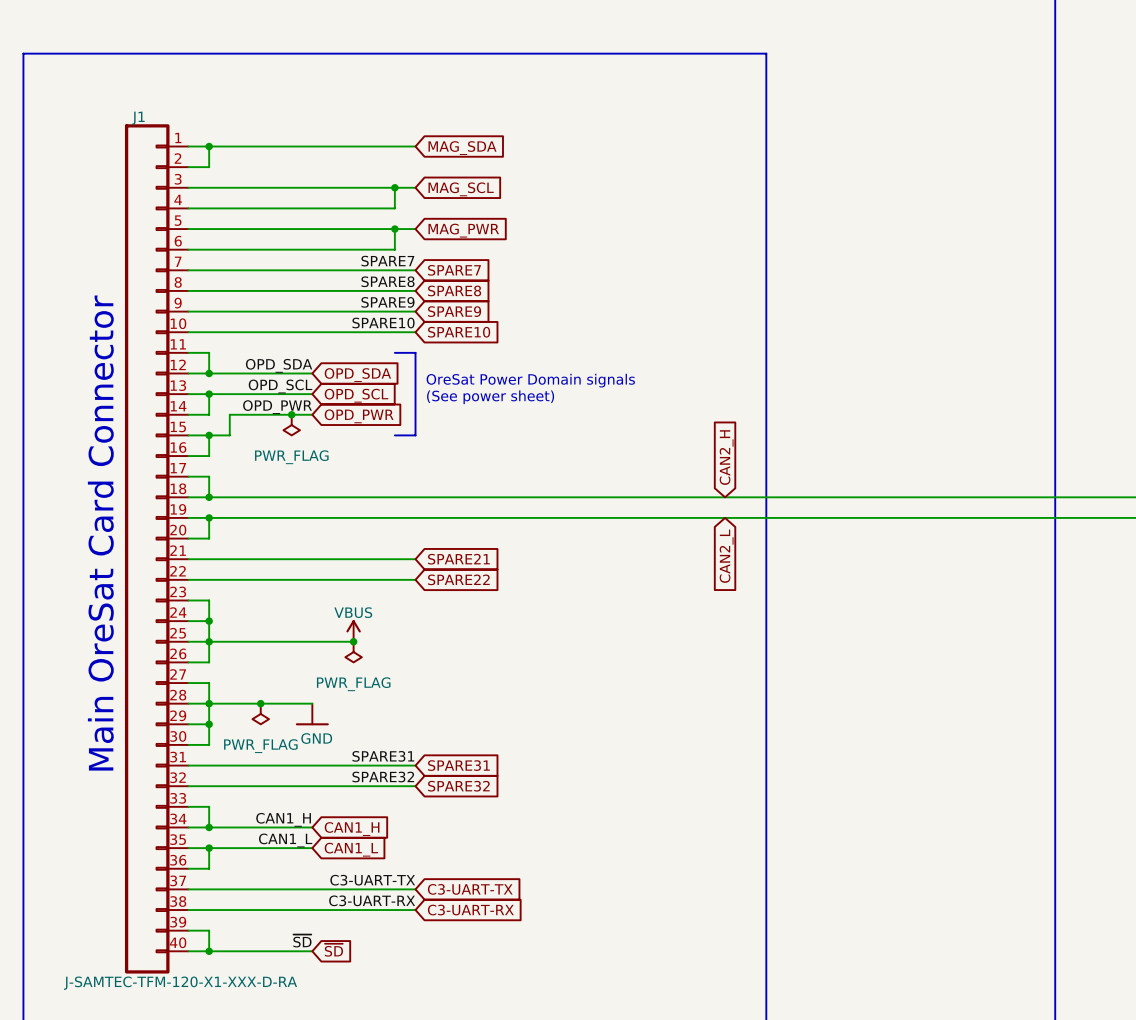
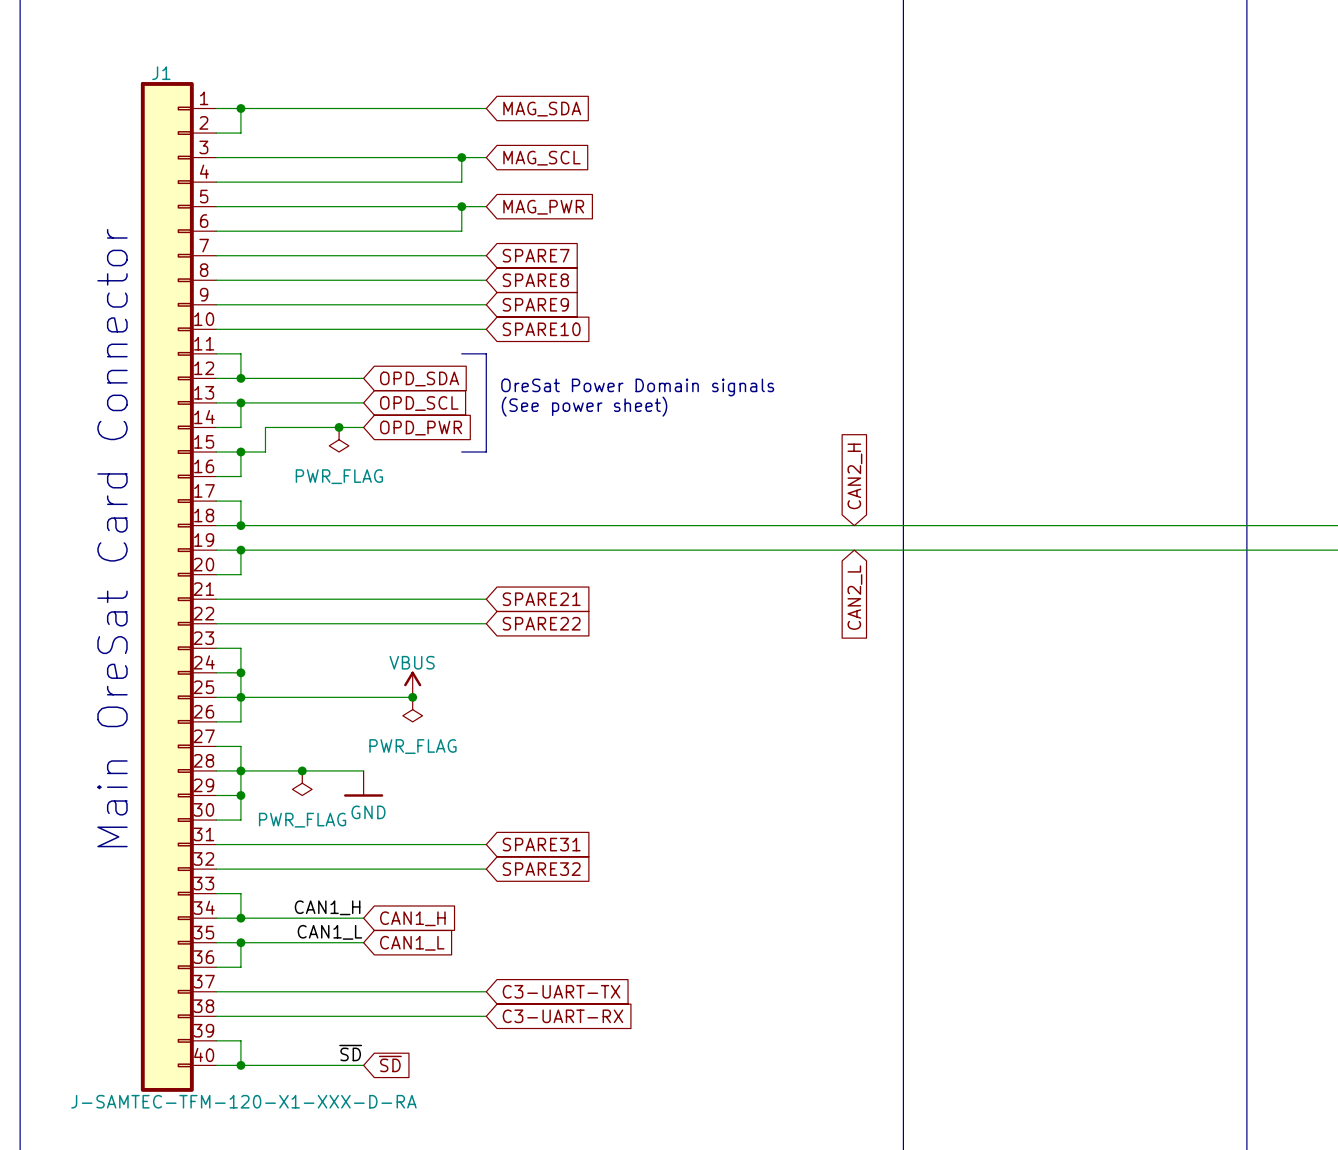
J1 symbol: [124, 124, 189, 974] -> [140, 82, 217, 1092]
label: SPARE7 (387, 261) -> none
label: SPARE8 (388, 281) -> none
label: SPARE9 (387, 302) -> none
label: SPARE10 (383, 323) -> none
label: OPD_SDA (279, 365) -> none
label: OPD_SCL (280, 386) -> none
label: OPD_PWR (277, 407) -> none
label: SPARE31 (383, 756) -> none
label: SPARE32 (383, 777) -> none
label: C3-UART-TX (372, 880) -> none
label: C3-UART-RX (372, 900) -> none

